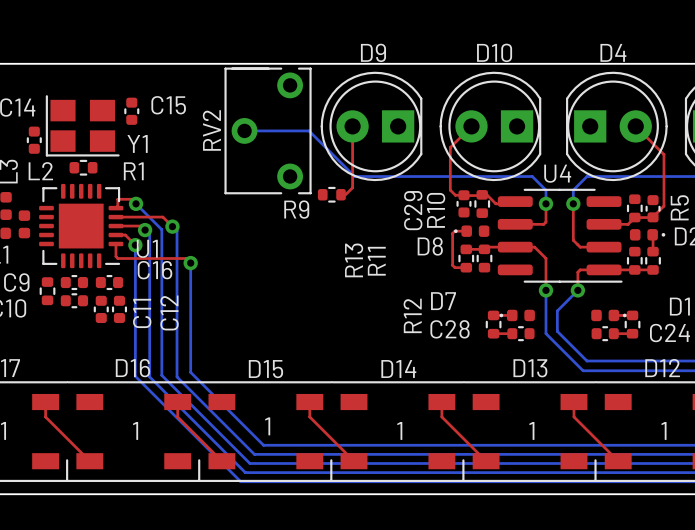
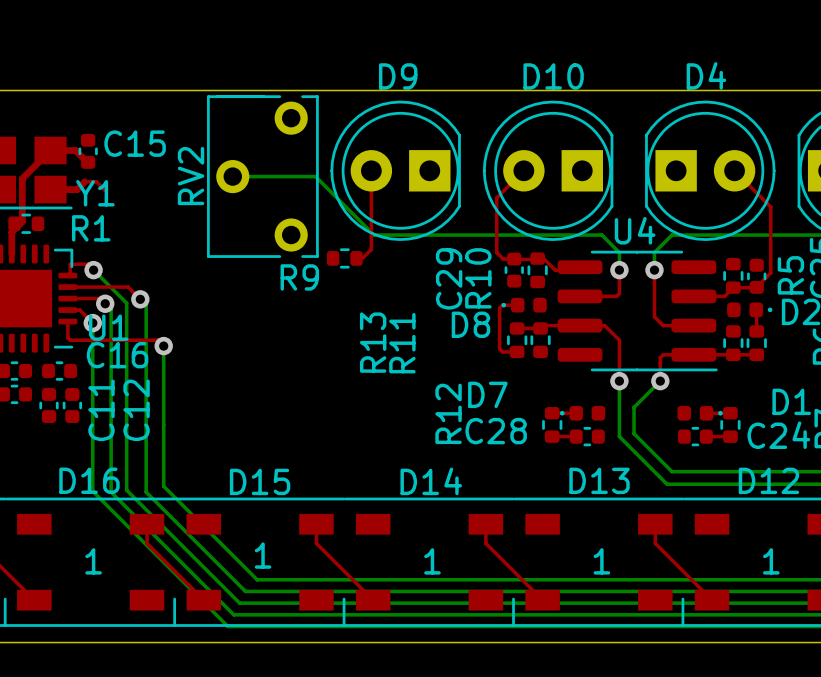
top track: none -> (60, 140) (22, 178) (22, 221) (11, 232) (11, 254)
top track: none -> (50, 150) (75, 150) (84, 159)
top track: none -> (50, 189) (77, 189) (84, 181) (96, 181) (106, 191)

